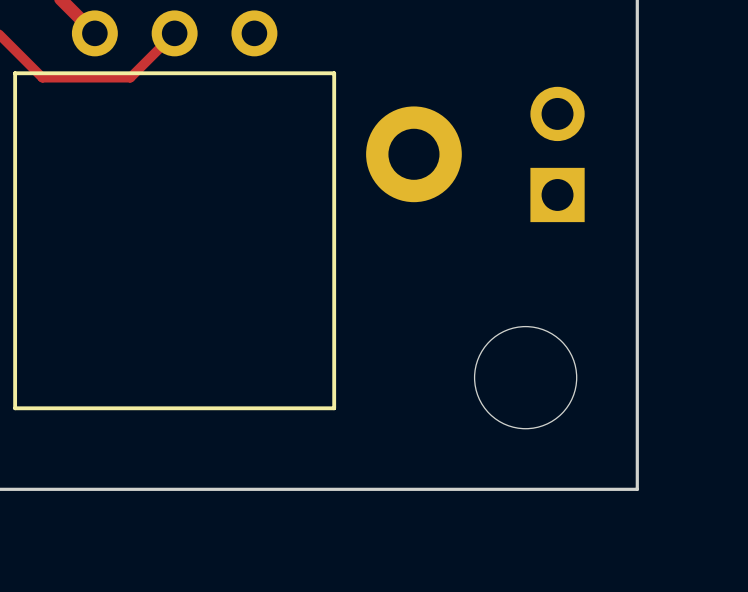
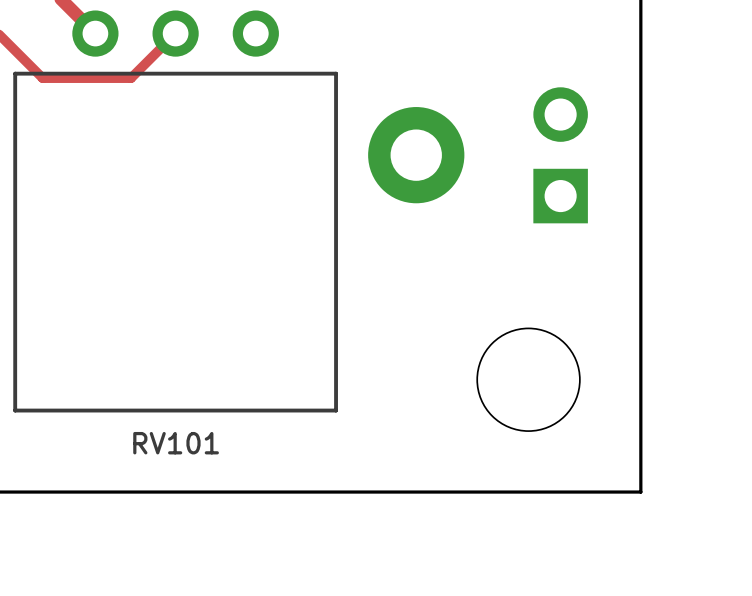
RV101 name: none -> RV101 (176, 443)

